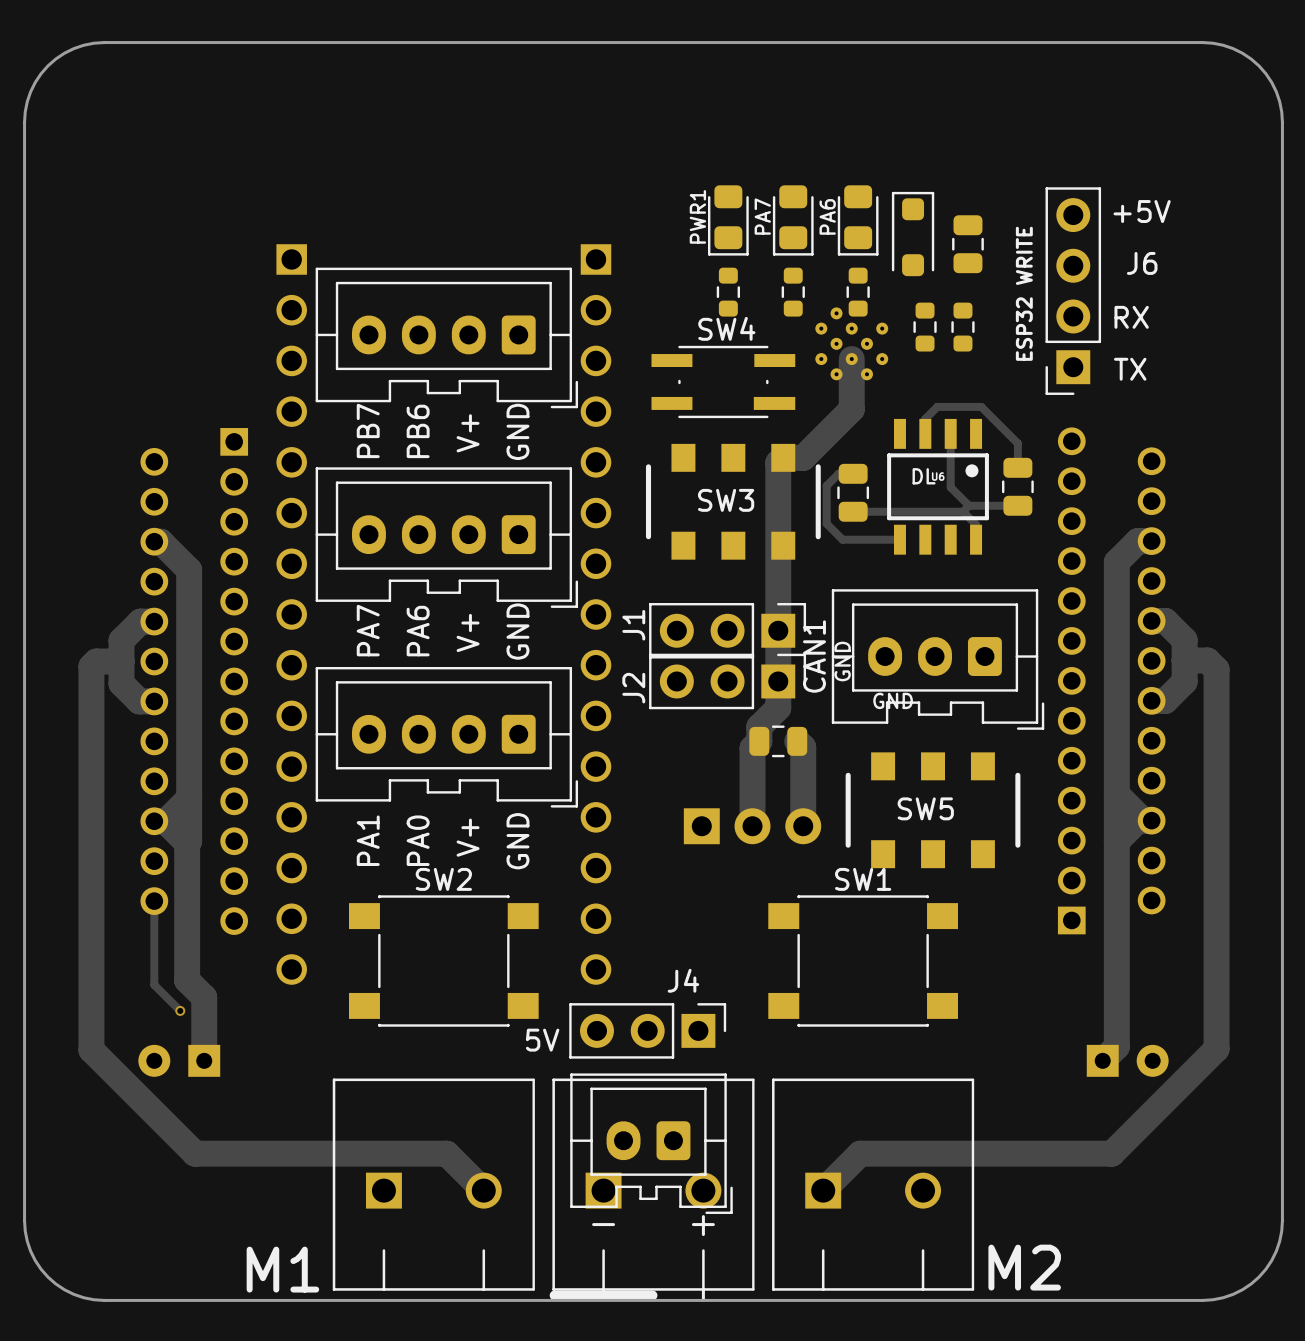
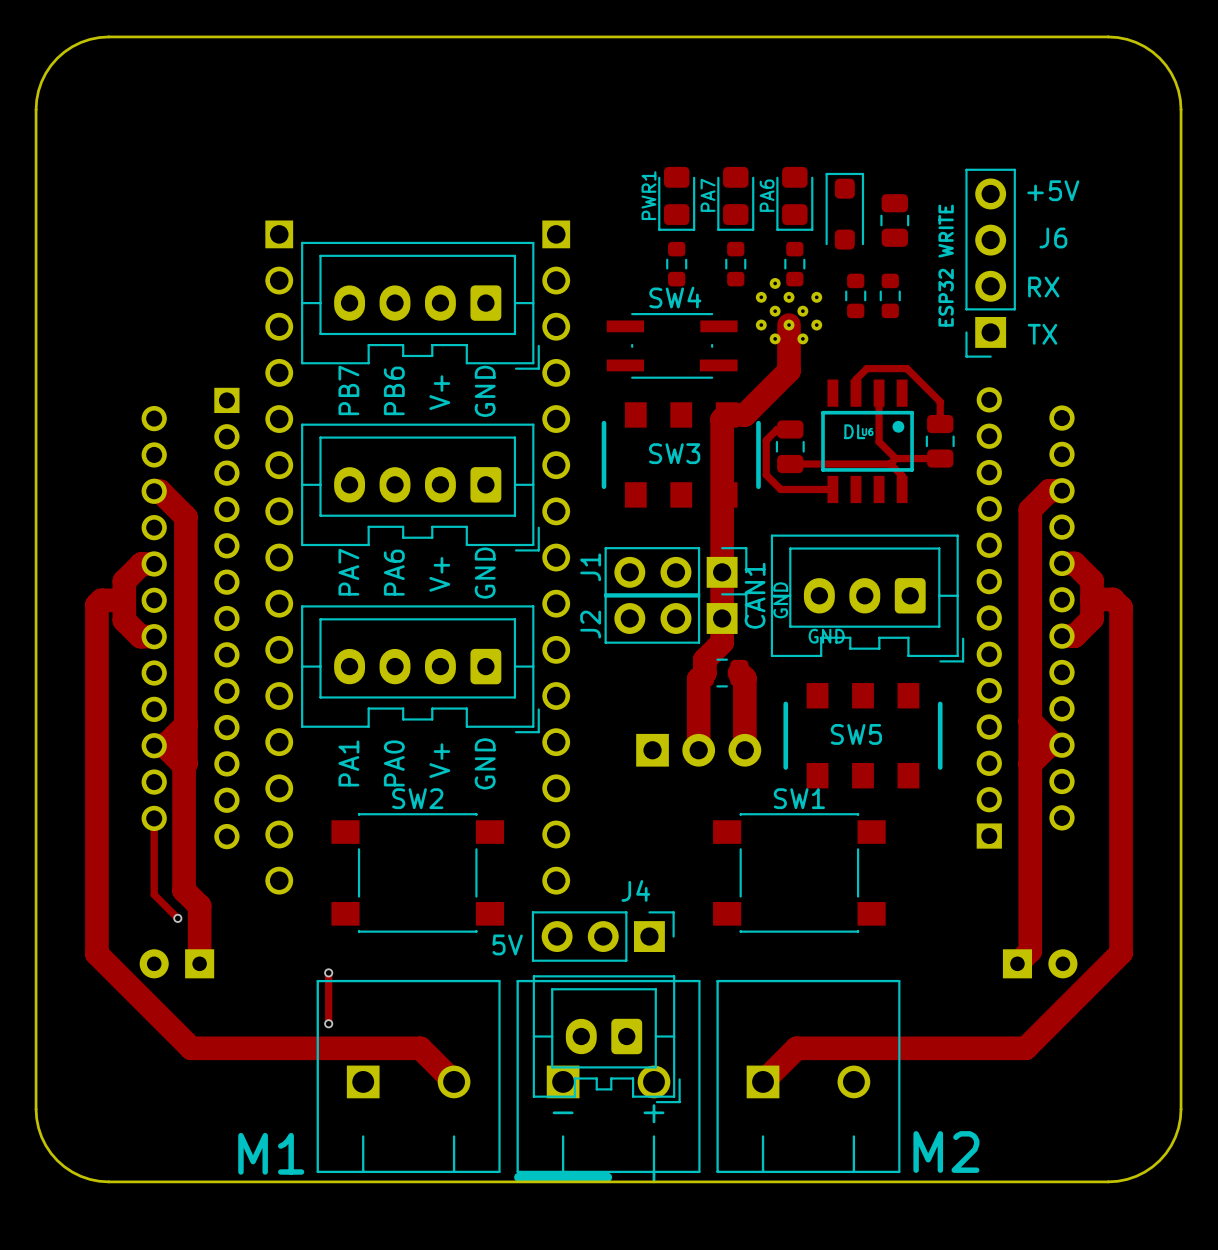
track: none -> (328, 972) (328, 1023)
via: none -> (328, 972)
via: none -> (328, 1023)

